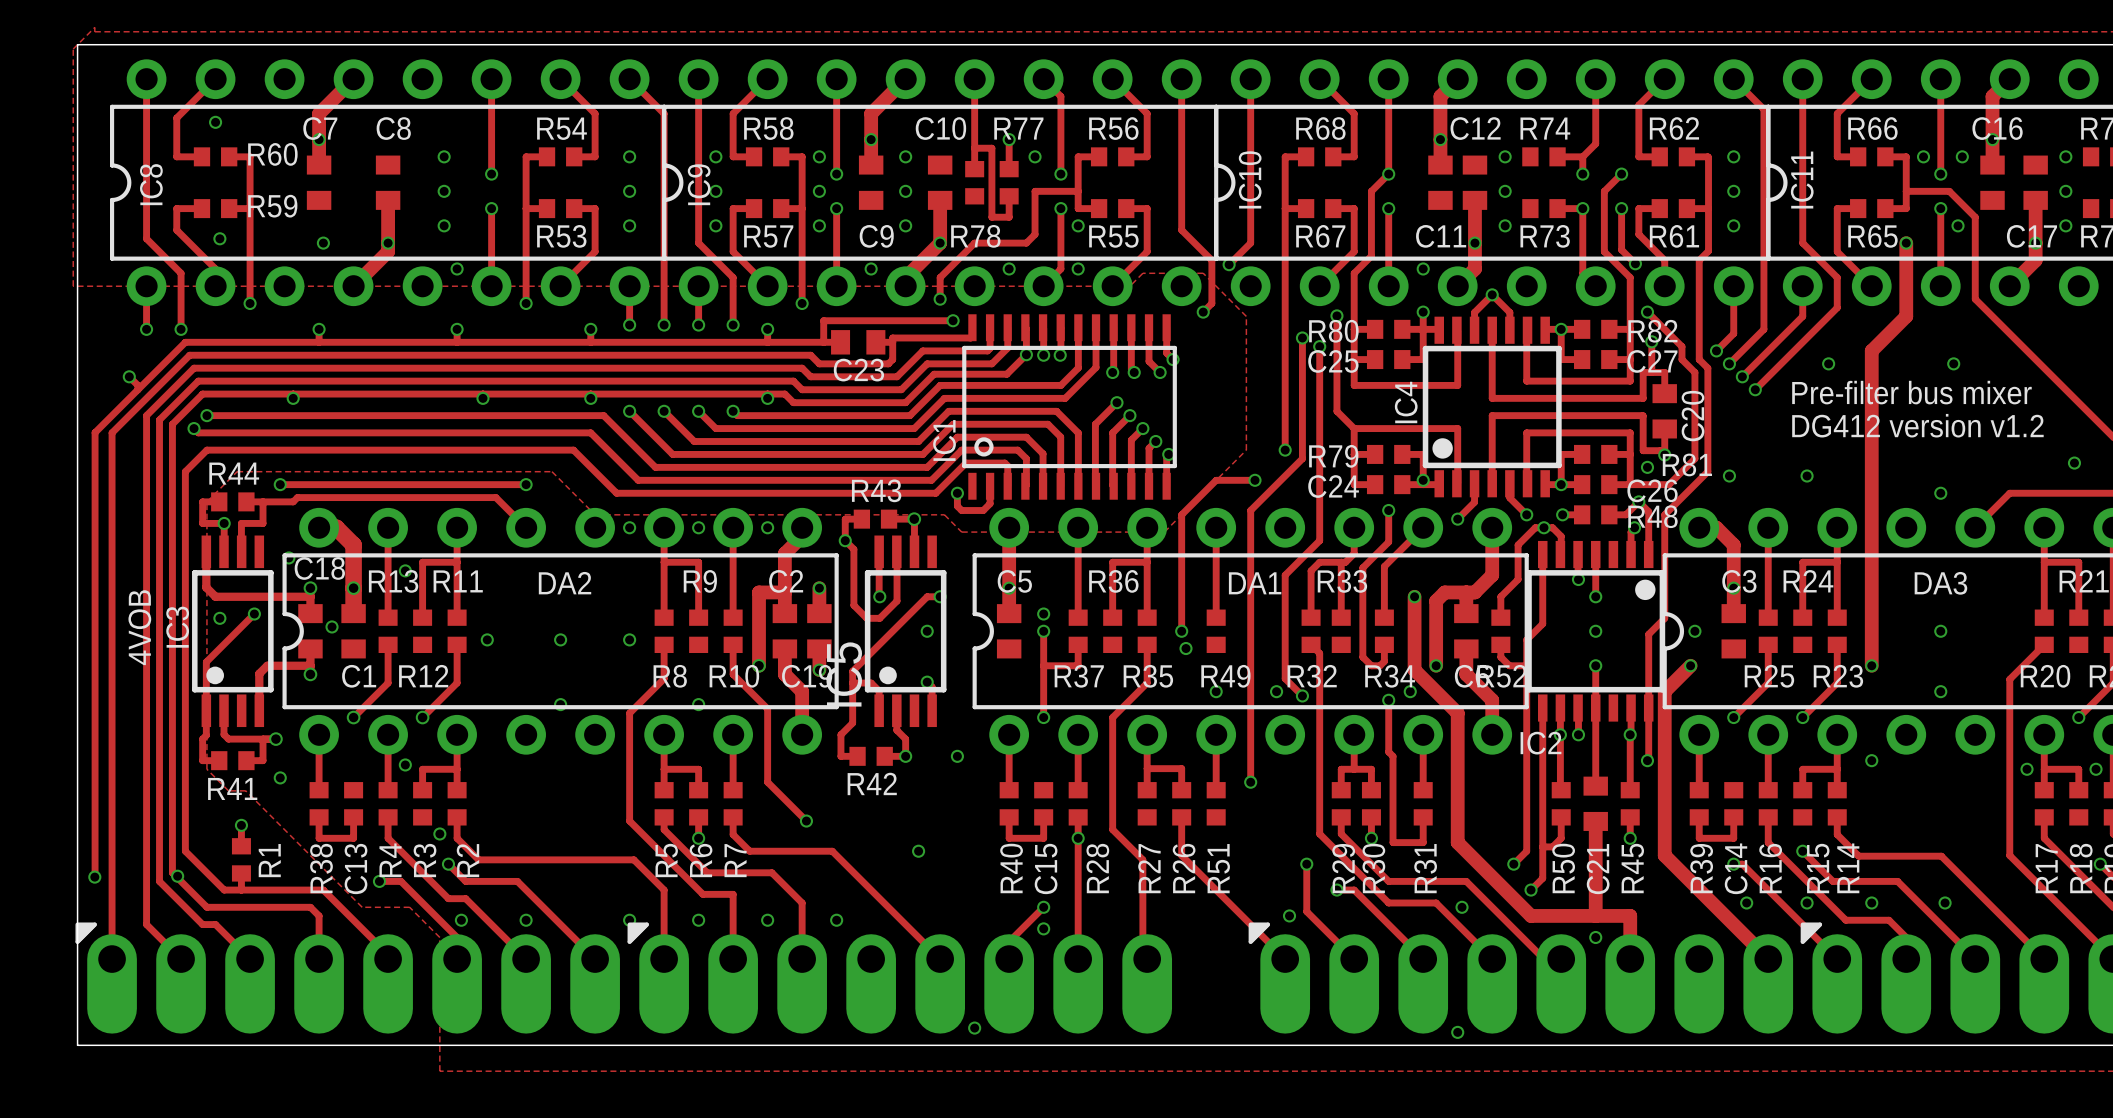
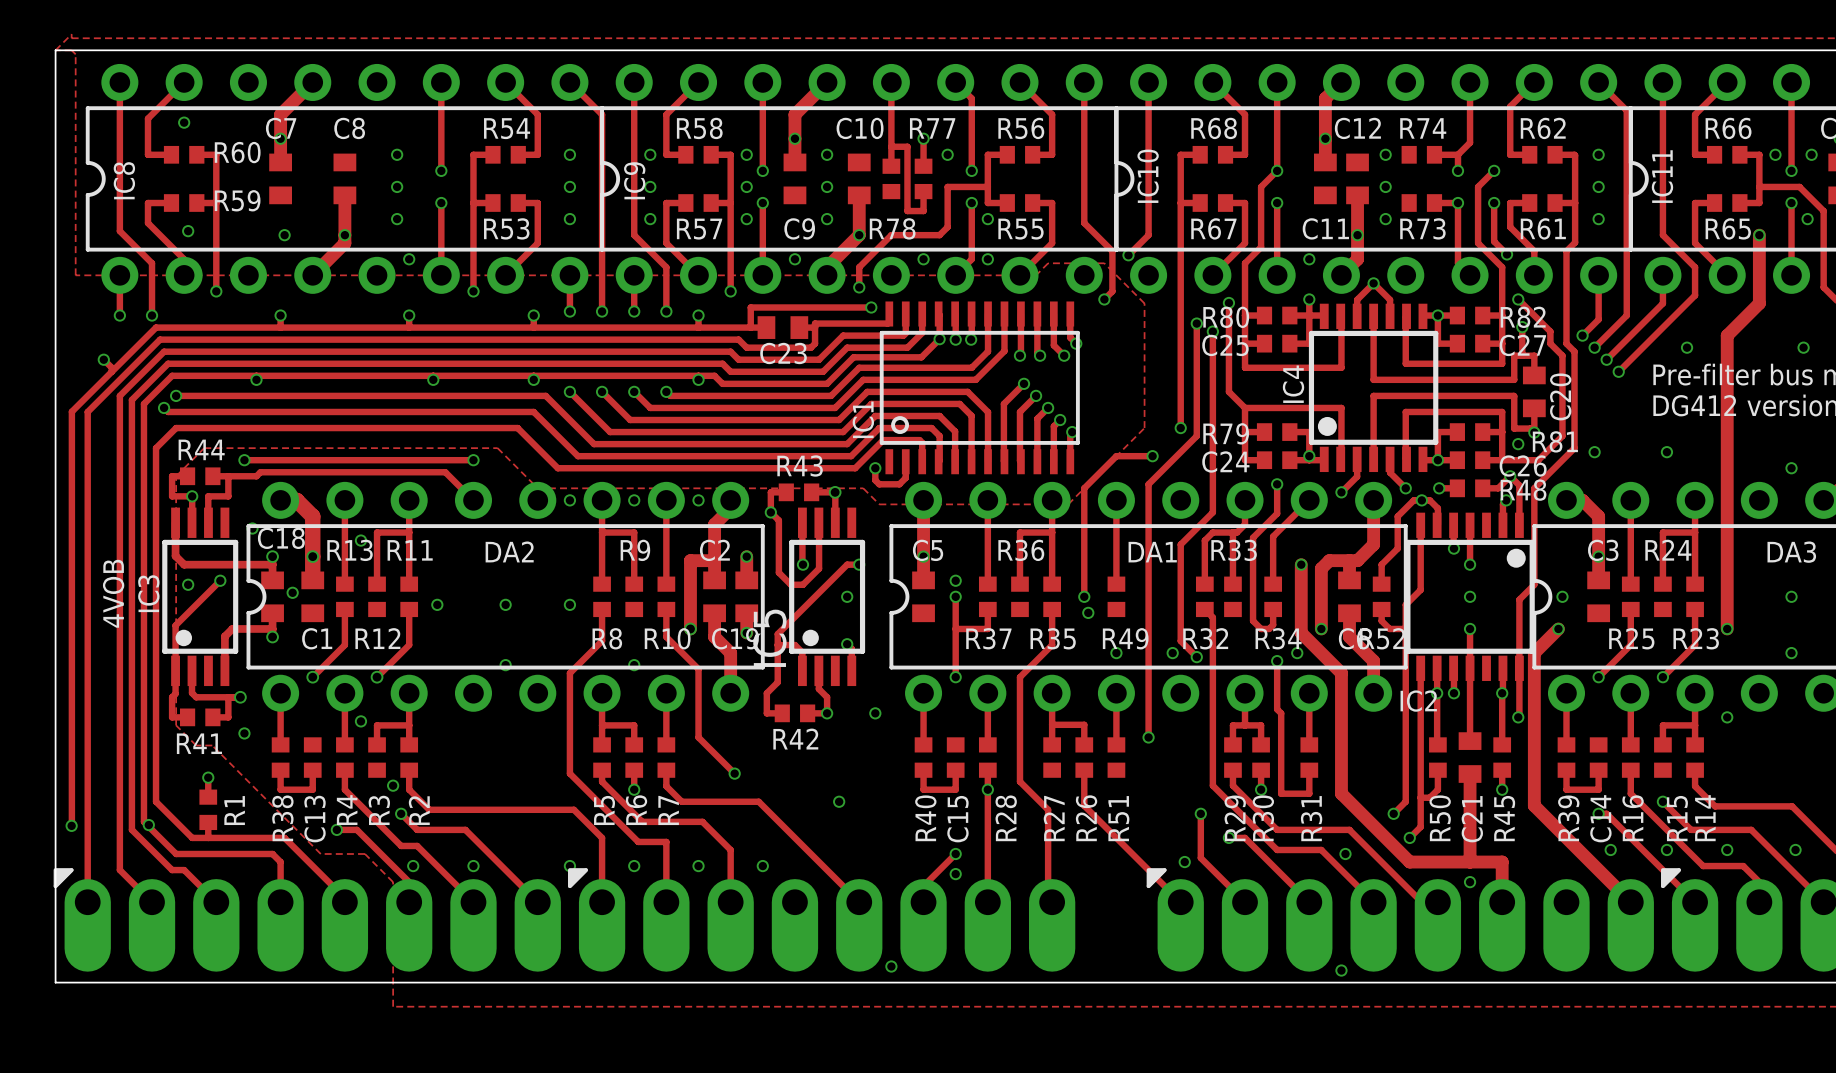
zone outline: (77, 44) (73, 49) (73, 286) (99, 286) -> (55, 50) (71, 50) (75, 54) (75, 275)

